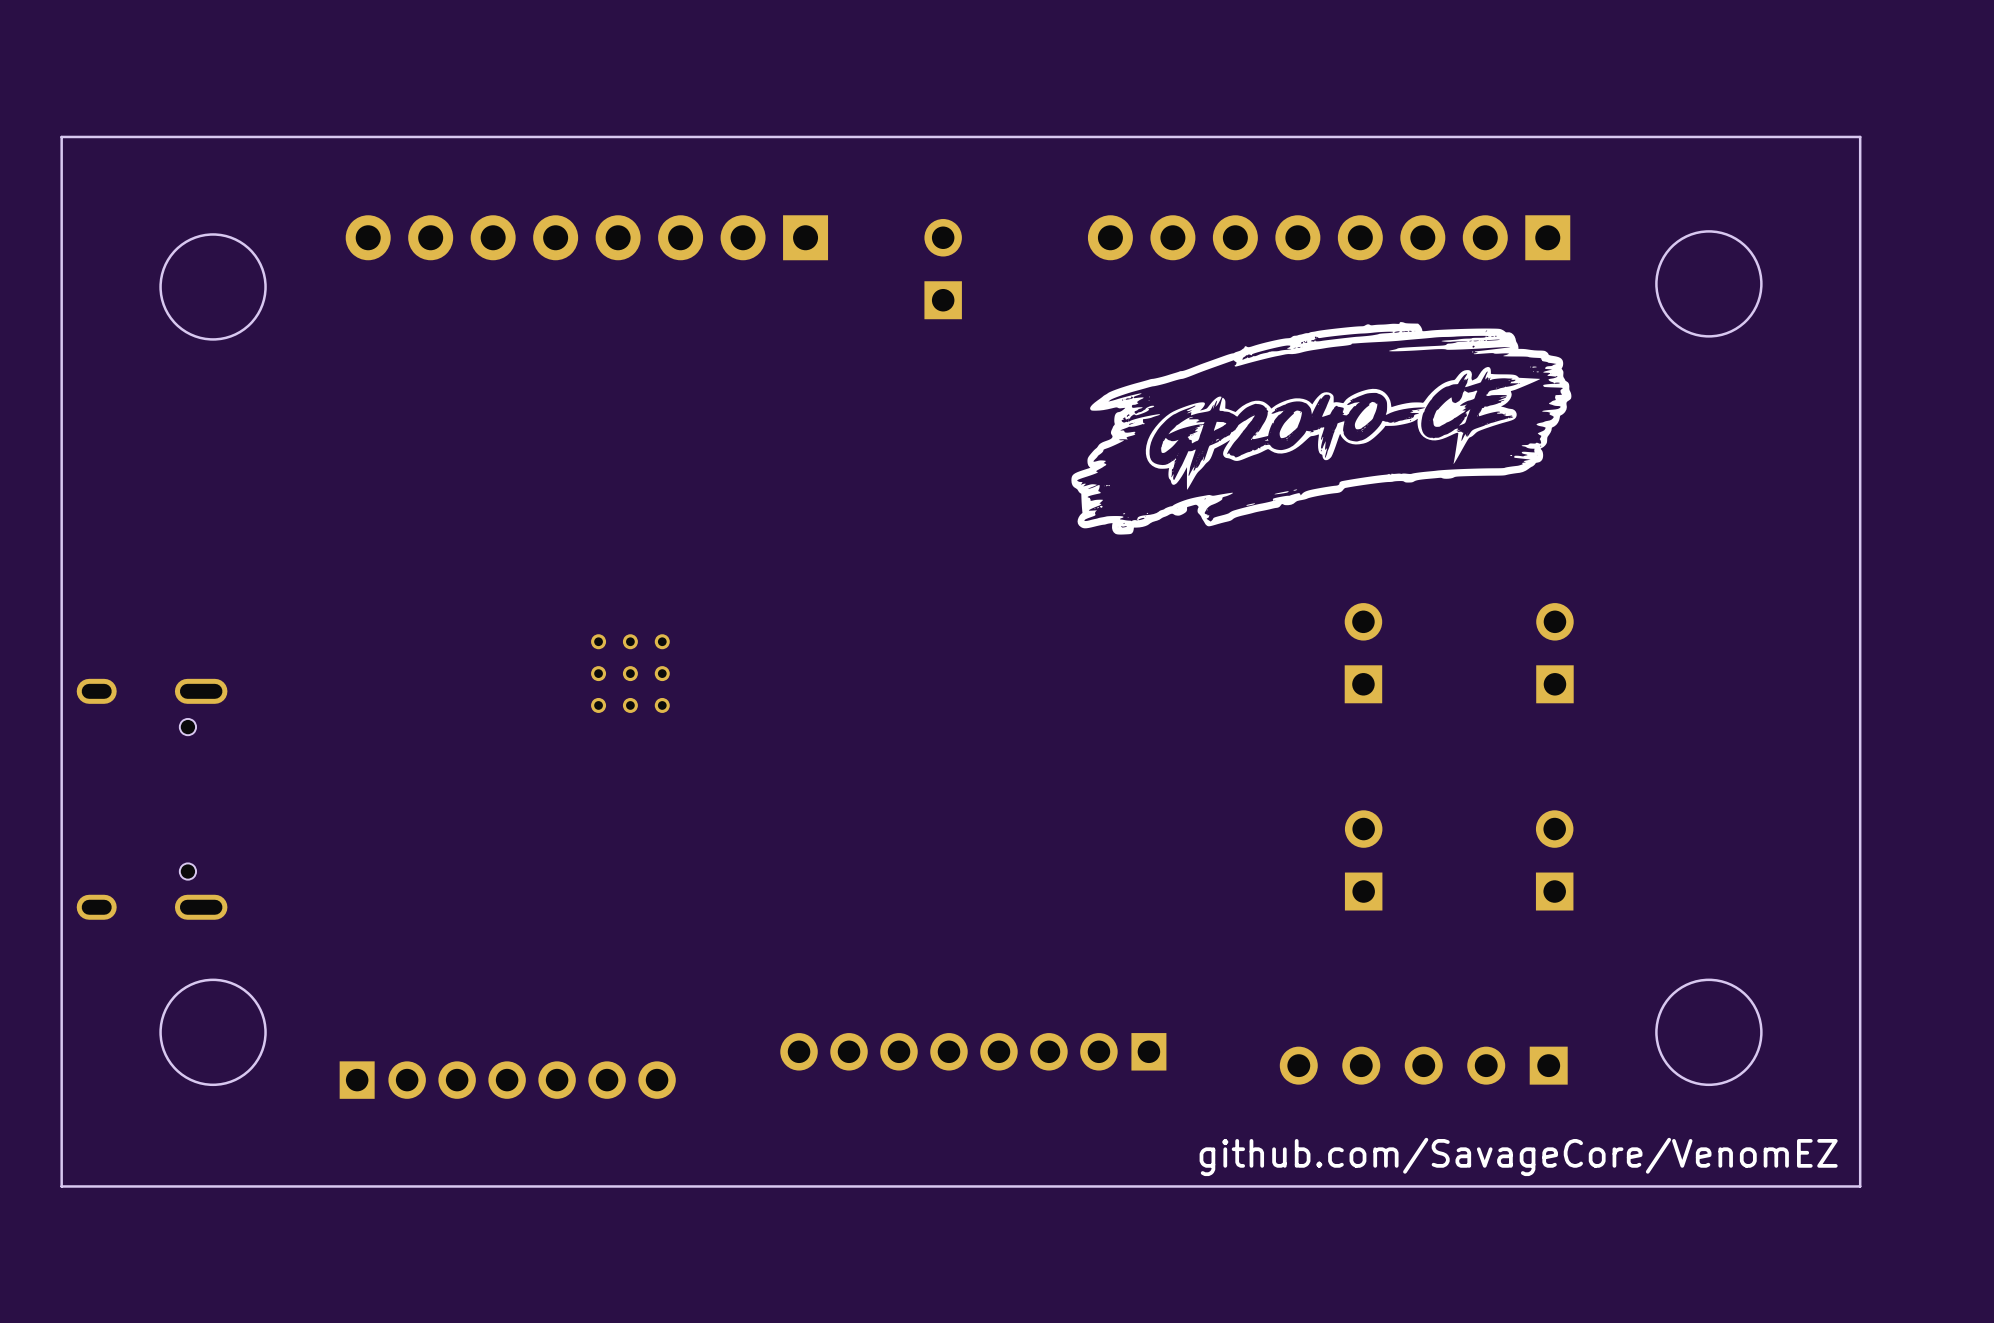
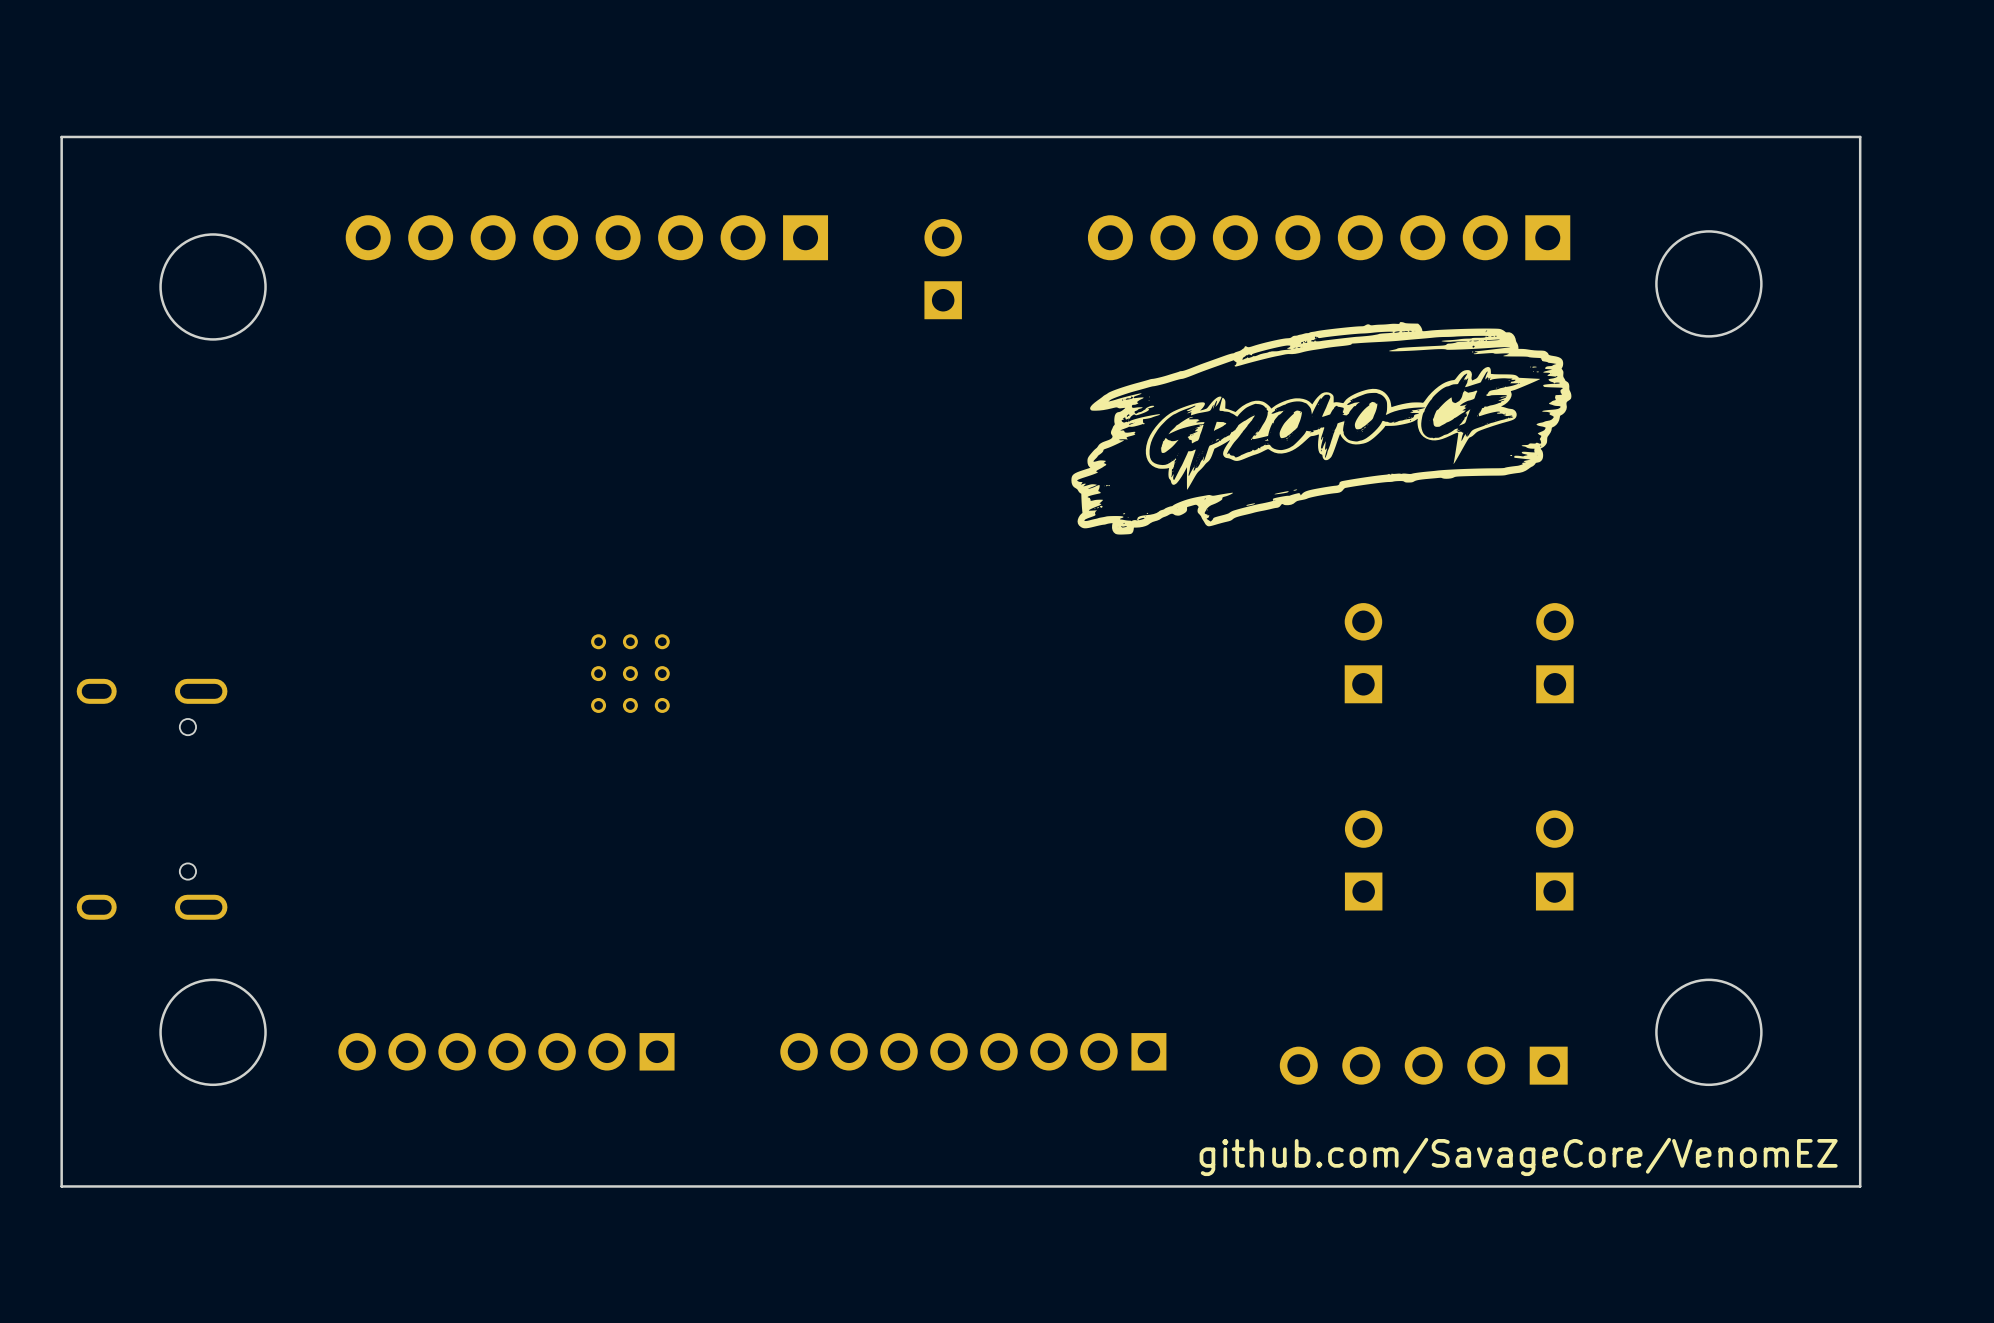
part rotation: 0° (507, 1080) -> 180° (506, 1051)

